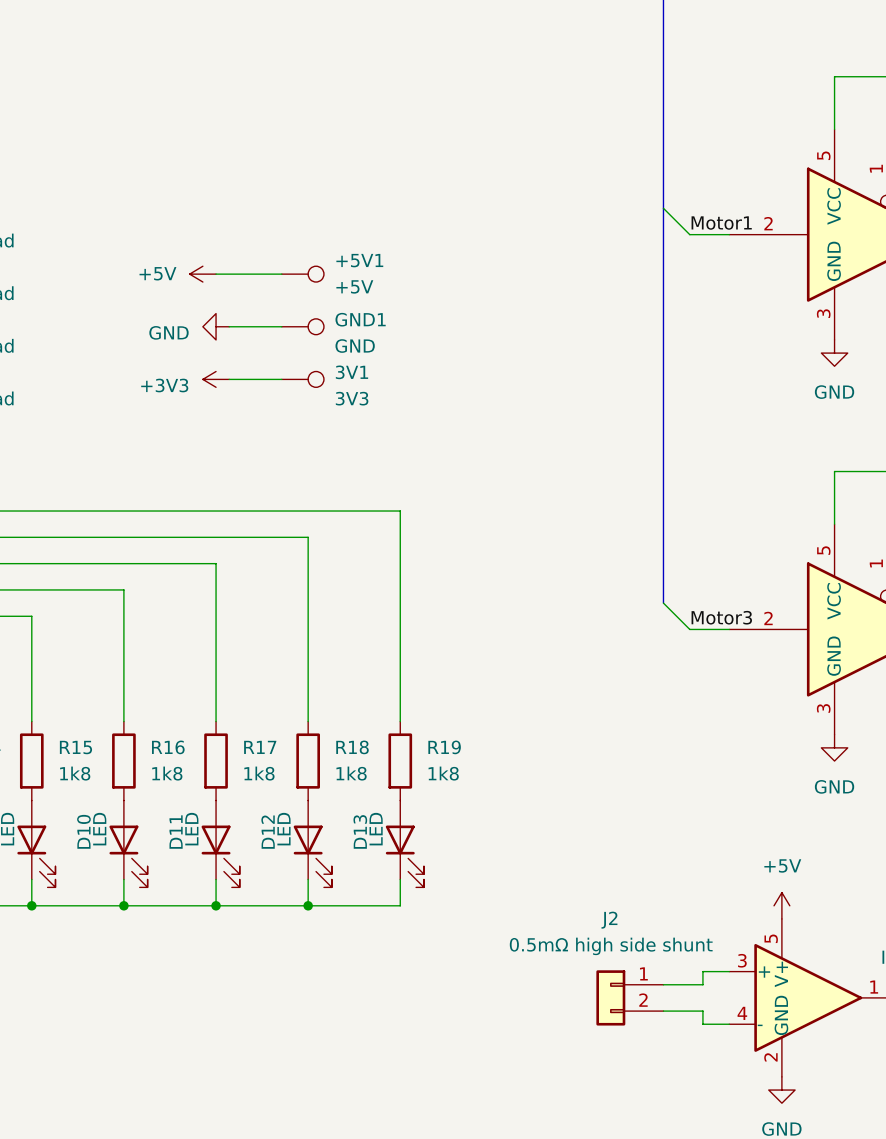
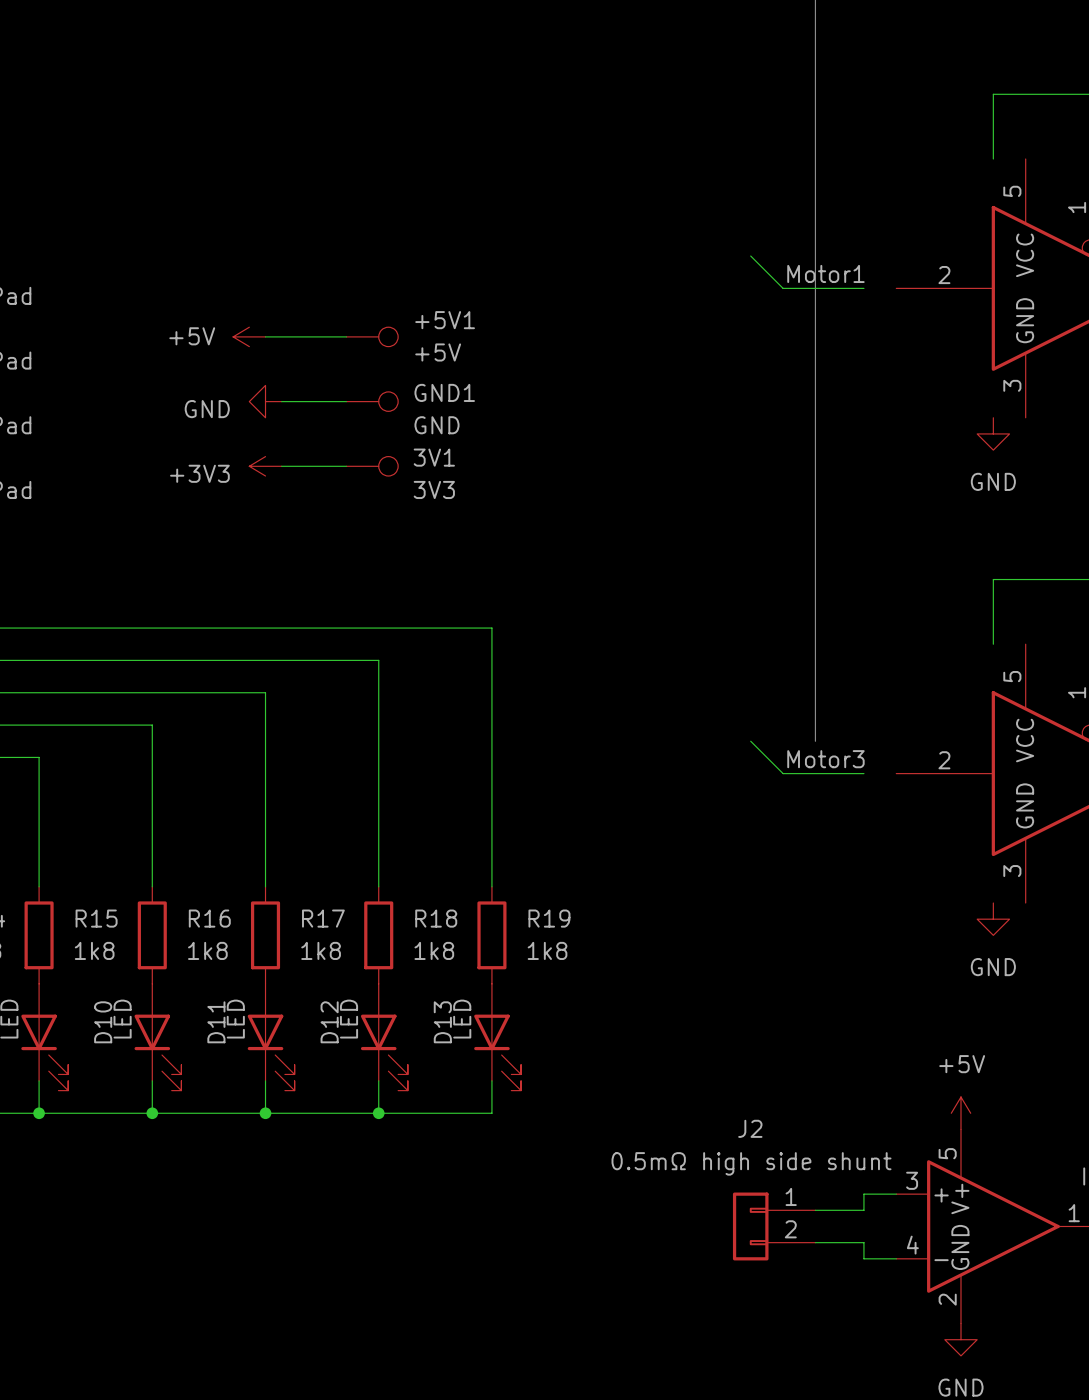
wire: (834, 76) (834, 129) -> (1025, 94) (993, 94) (993, 159)
wire: (663, 208) (689, 234) -> (750, 256) (783, 288) (847, 288)
label position: Motor1 (721, 223) -> Motor1 (825, 273)
wire: (702, 234) (729, 234) -> none
power symbol position: GND (834, 353) -> GND (993, 433)
wire: (834, 471) (834, 524) -> (1025, 579) (993, 579) (993, 644)
wire: (663, 603) (689, 629) -> (750, 741) (783, 773) (847, 773)
label position: Motor3 (721, 617) -> Motor3 (825, 759)
wire: (702, 629) (729, 629) -> none
power symbol position: GND (834, 747) -> GND (993, 919)

